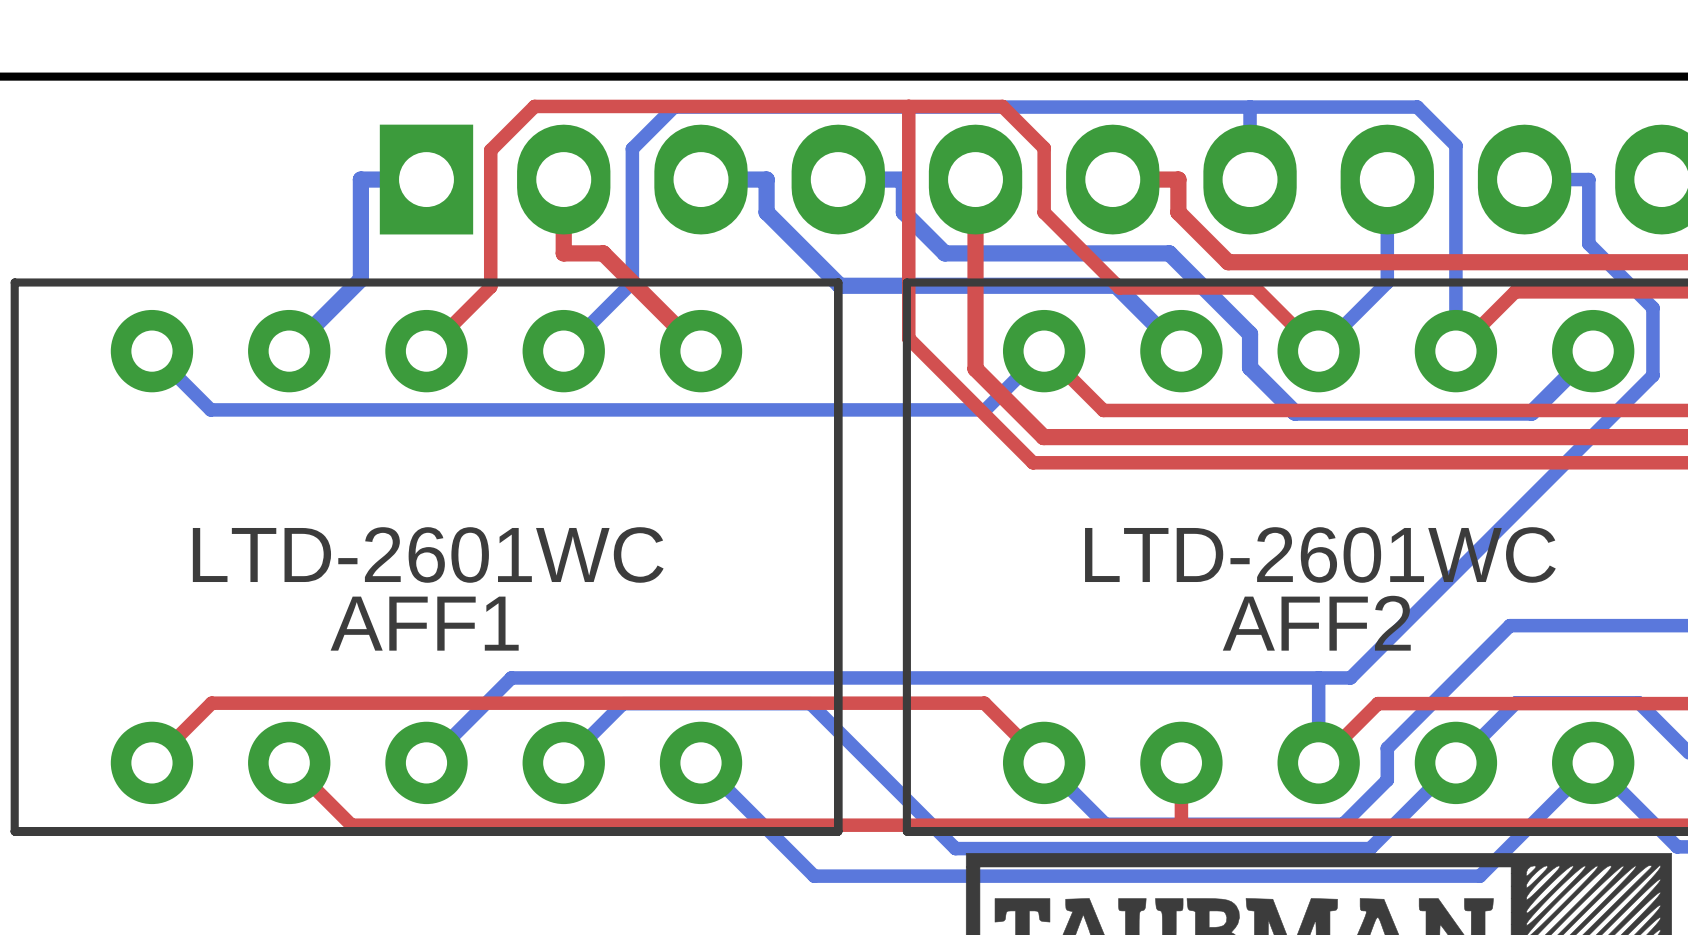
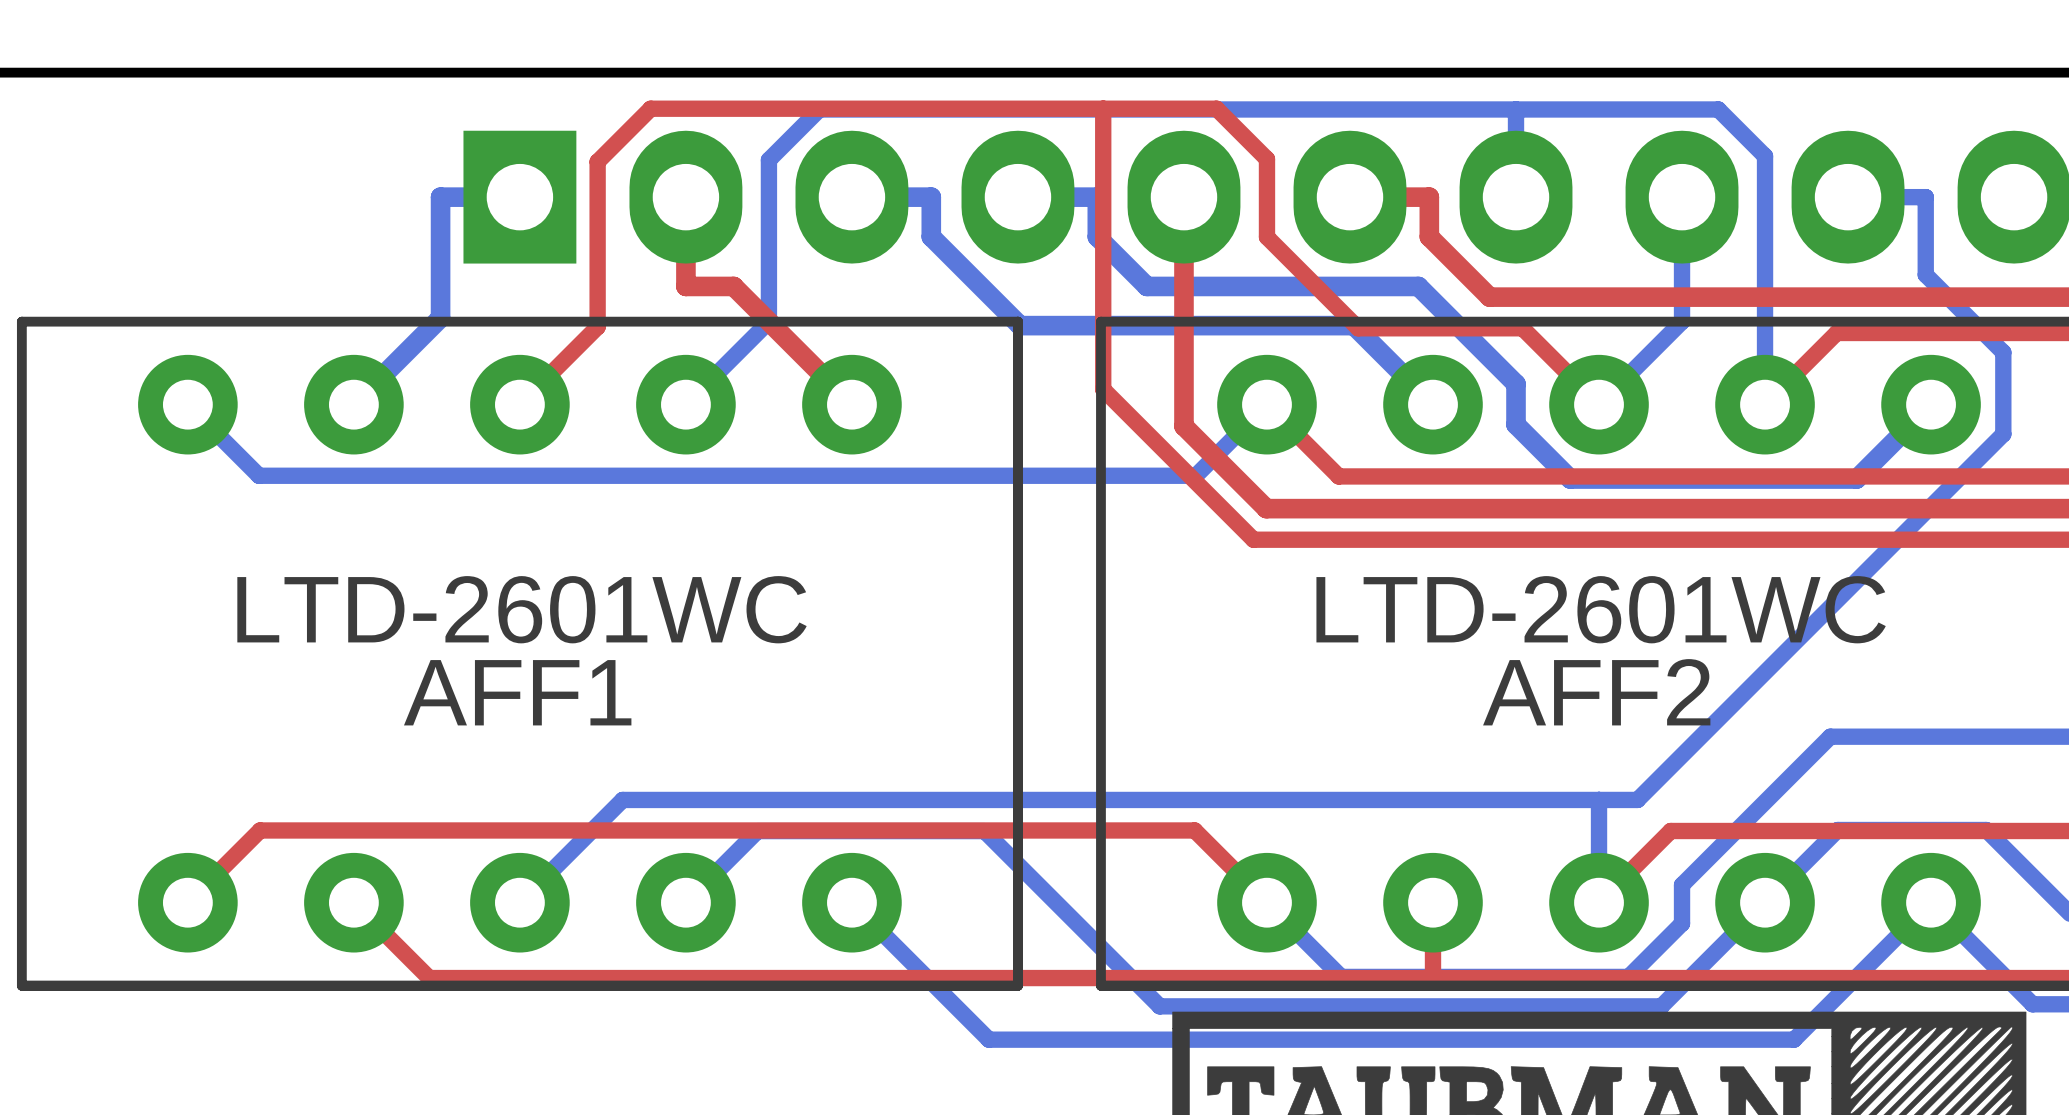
AFF1 value position: LTD-2601WC (428, 554) -> LTD-2601WC (522, 609)
AFF2 value position: LTD-2601WC (1320, 554) -> LTD-2601WC (1601, 609)
AFF1 name position: AFF1 (424, 623) -> AFF1 (517, 692)
AFF2 name position: AFF2 (1316, 623) -> AFF2 (1596, 692)

